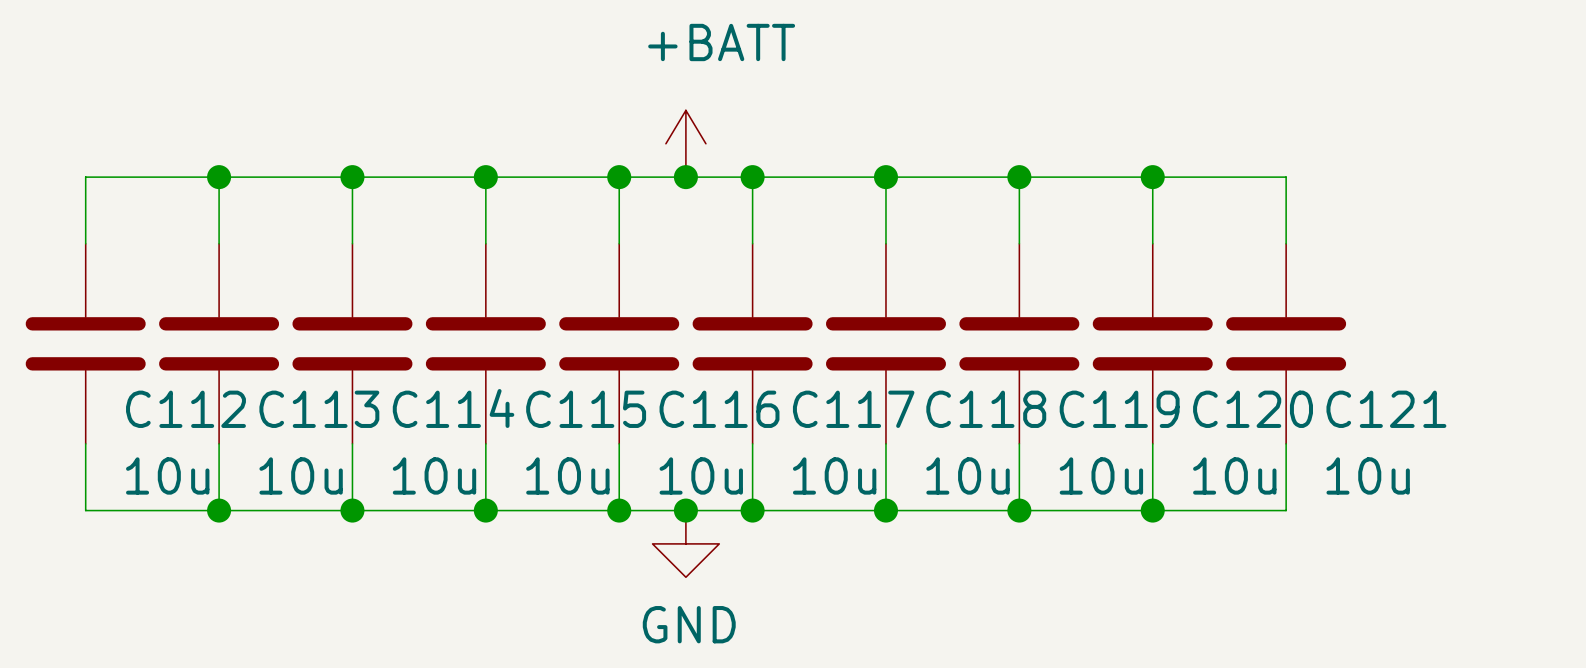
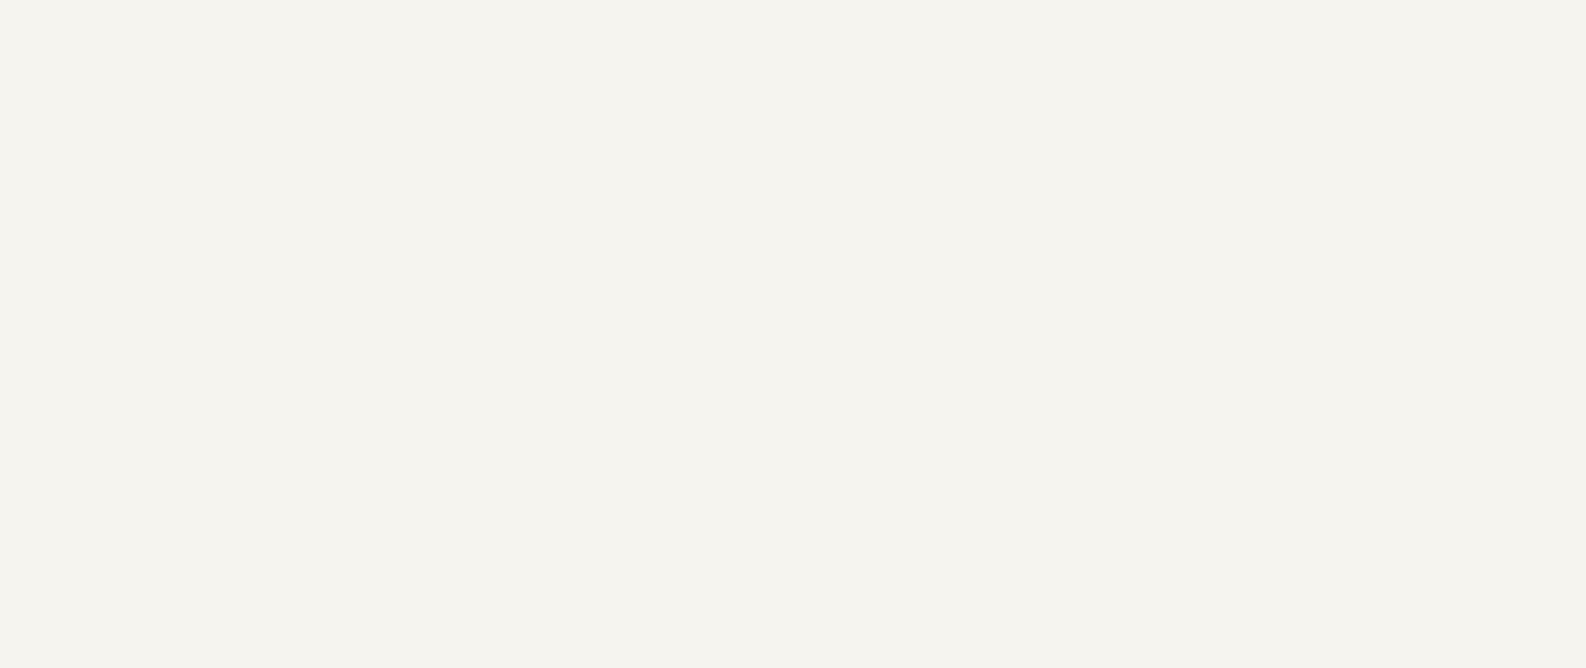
power symbol: +BATT (685, 143) -> none
wire: (219, 177) (219, 243) -> none
junction: (219, 177) -> none
wire: (352, 177) (352, 243) -> none
junction: (352, 177) -> none
wire: (485, 177) (485, 243) -> none
junction: (485, 177) -> none
wire: (619, 177) (619, 243) -> none
junction: (619, 177) -> none
junction: (685, 177) -> none
wire: (752, 177) (752, 243) -> none
junction: (752, 177) -> none
wire: (885, 177) (885, 243) -> none
junction: (885, 177) -> none
wire: (1019, 177) (1019, 243) -> none
junction: (1019, 177) -> none
wire: (1152, 177) (1152, 243) -> none
junction: (1152, 177) -> none
wire: (85, 243) (85, 177) (1286, 177) (1286, 243) -> none
C112: 10u (85, 343) -> none
C113: 10u (219, 343) -> none
C114: 10u (352, 343) -> none
C115: 10u (485, 343) -> none
C116: 10u (619, 343) -> none
C117: 10u (752, 343) -> none
C118: 10u (885, 343) -> none
C119: 10u (1019, 343) -> none
C120: 10u (1152, 343) -> none
C121: 10u (1286, 343) -> none
wire: (85, 443) (85, 510) (1286, 510) (1286, 443) -> none
wire: (219, 443) (219, 510) -> none
wire: (352, 443) (352, 510) -> none
wire: (485, 443) (485, 510) -> none
wire: (619, 443) (619, 510) -> none
wire: (752, 443) (752, 510) -> none
wire: (885, 443) (885, 510) -> none
wire: (1019, 443) (1019, 510) -> none
wire: (1152, 443) (1152, 510) -> none
junction: (219, 510) -> none
junction: (352, 510) -> none
junction: (485, 510) -> none
junction: (619, 510) -> none
junction: (685, 510) -> none
junction: (752, 510) -> none
junction: (885, 510) -> none
junction: (1019, 510) -> none
junction: (1152, 510) -> none
power symbol: GND (685, 543) -> none

